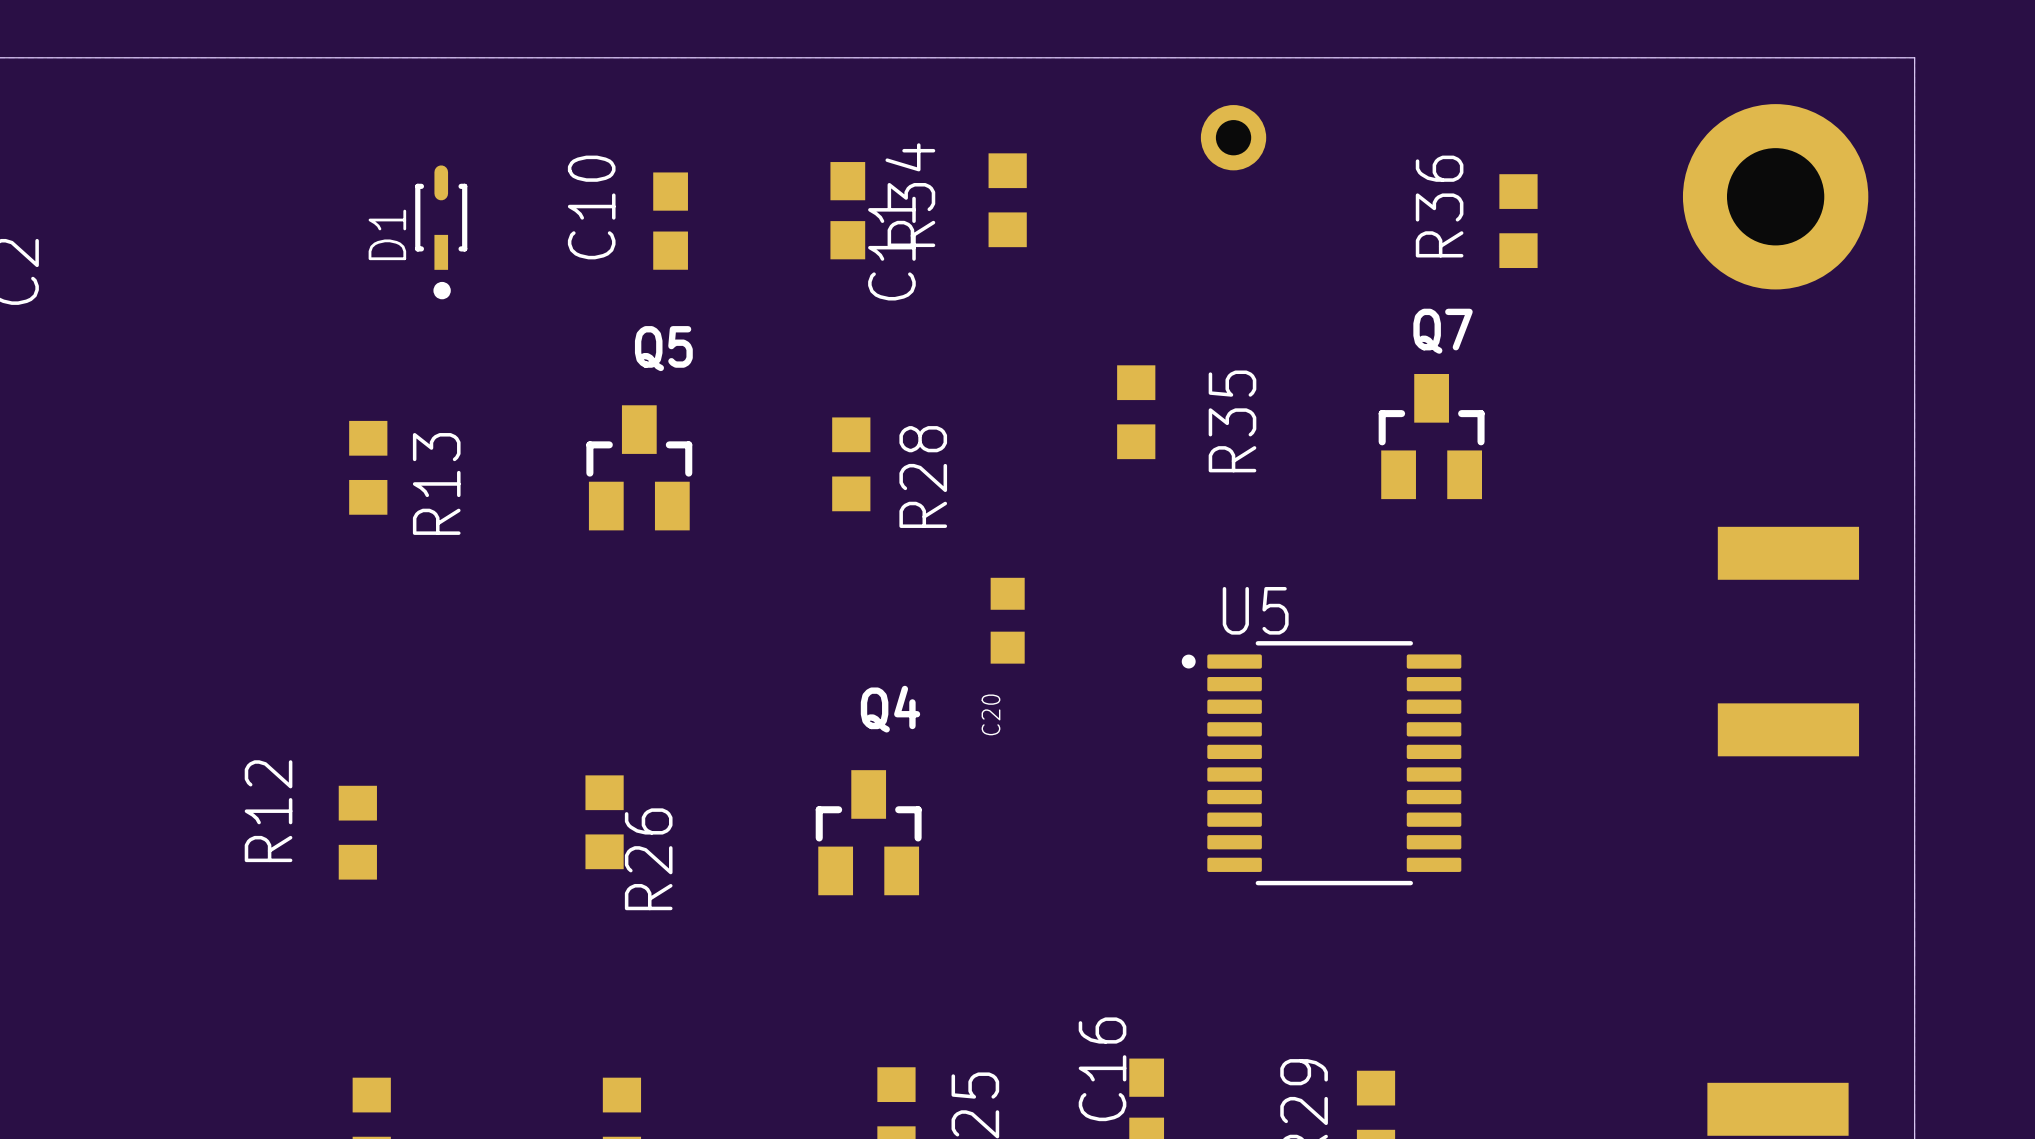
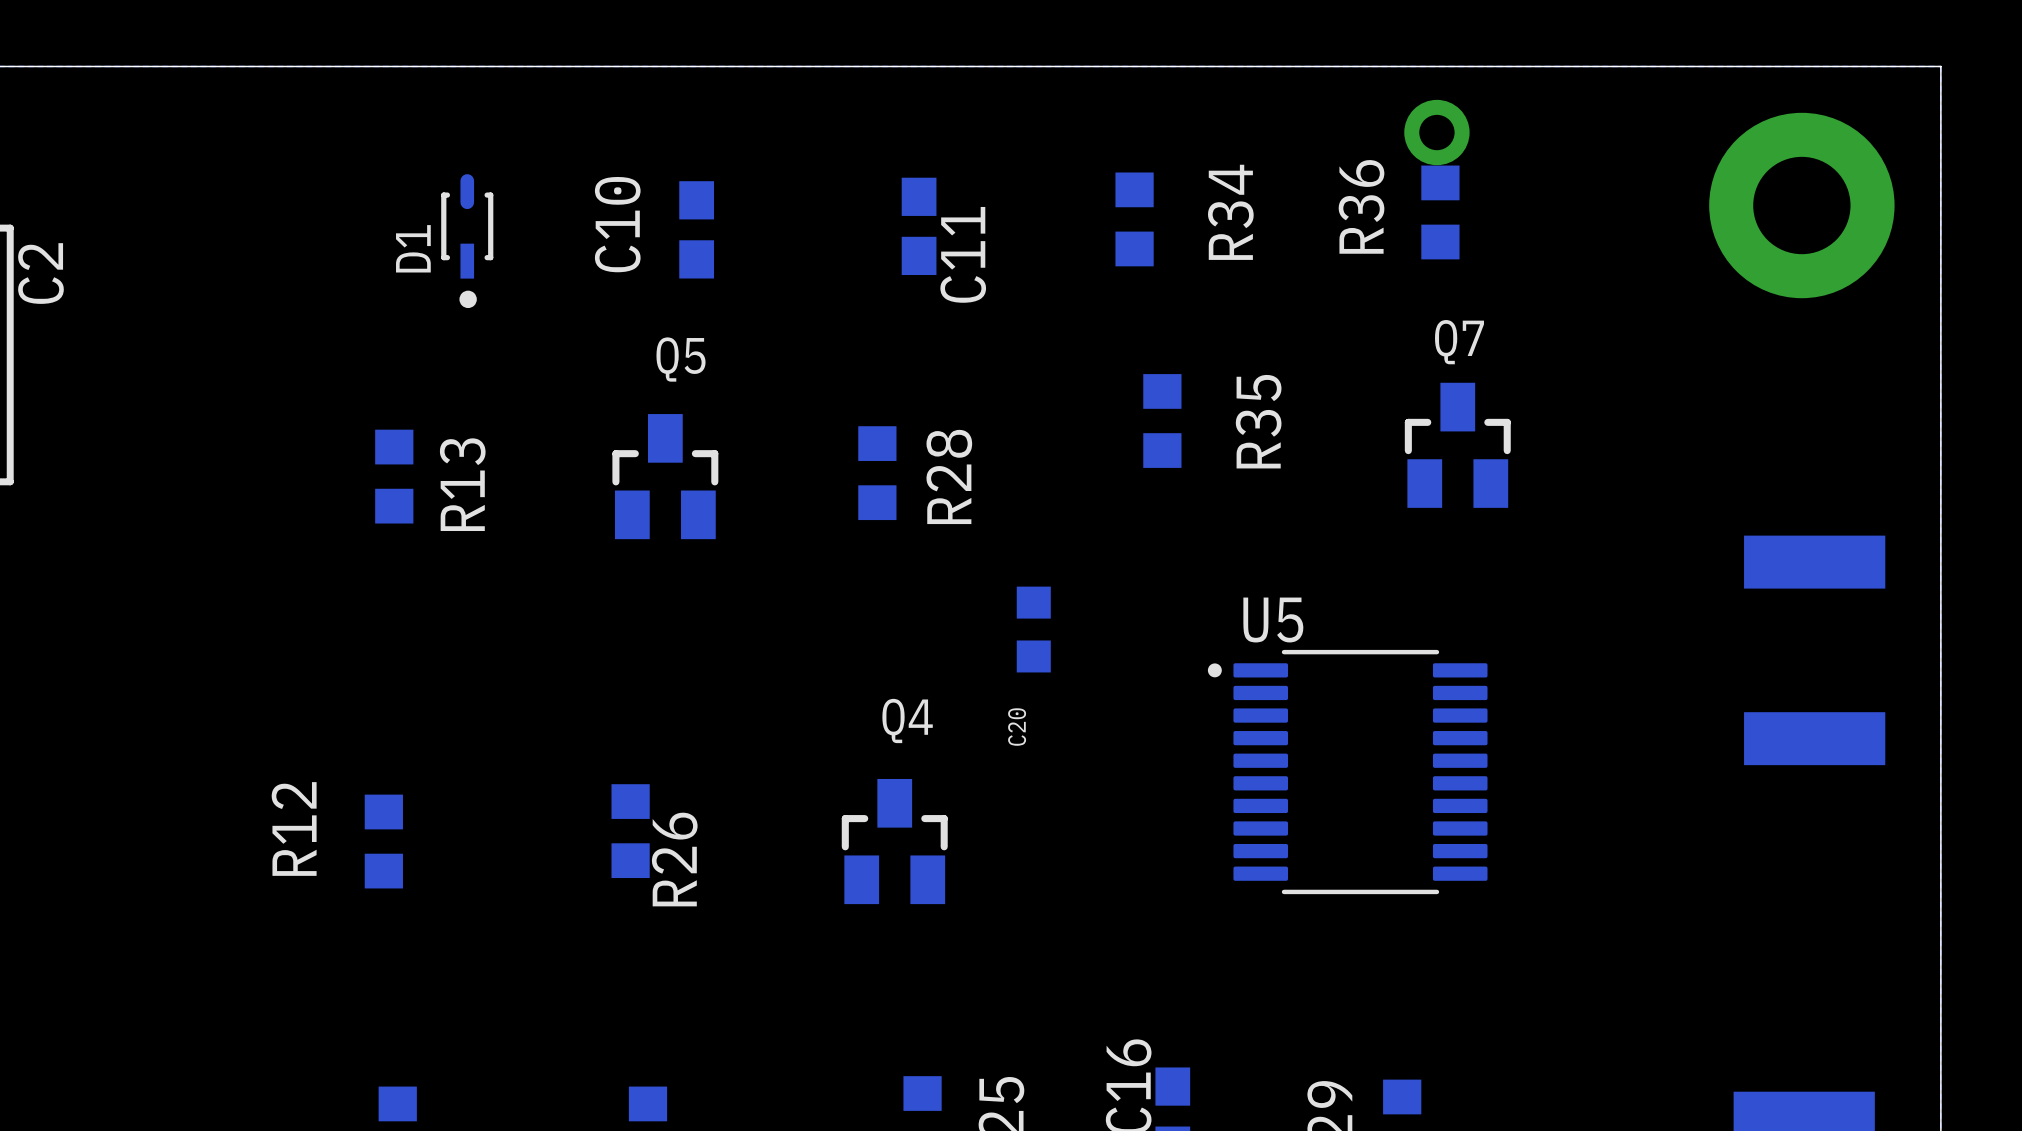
part position: (1233, 137) -> (1436, 132)
R34 name position: R34 (910, 195) -> R34 (1230, 212)
R34 position: (1007, 200) -> (1134, 219)
C11 position: (847, 210) -> (919, 226)
R36 position: (1518, 221) -> (1440, 212)

